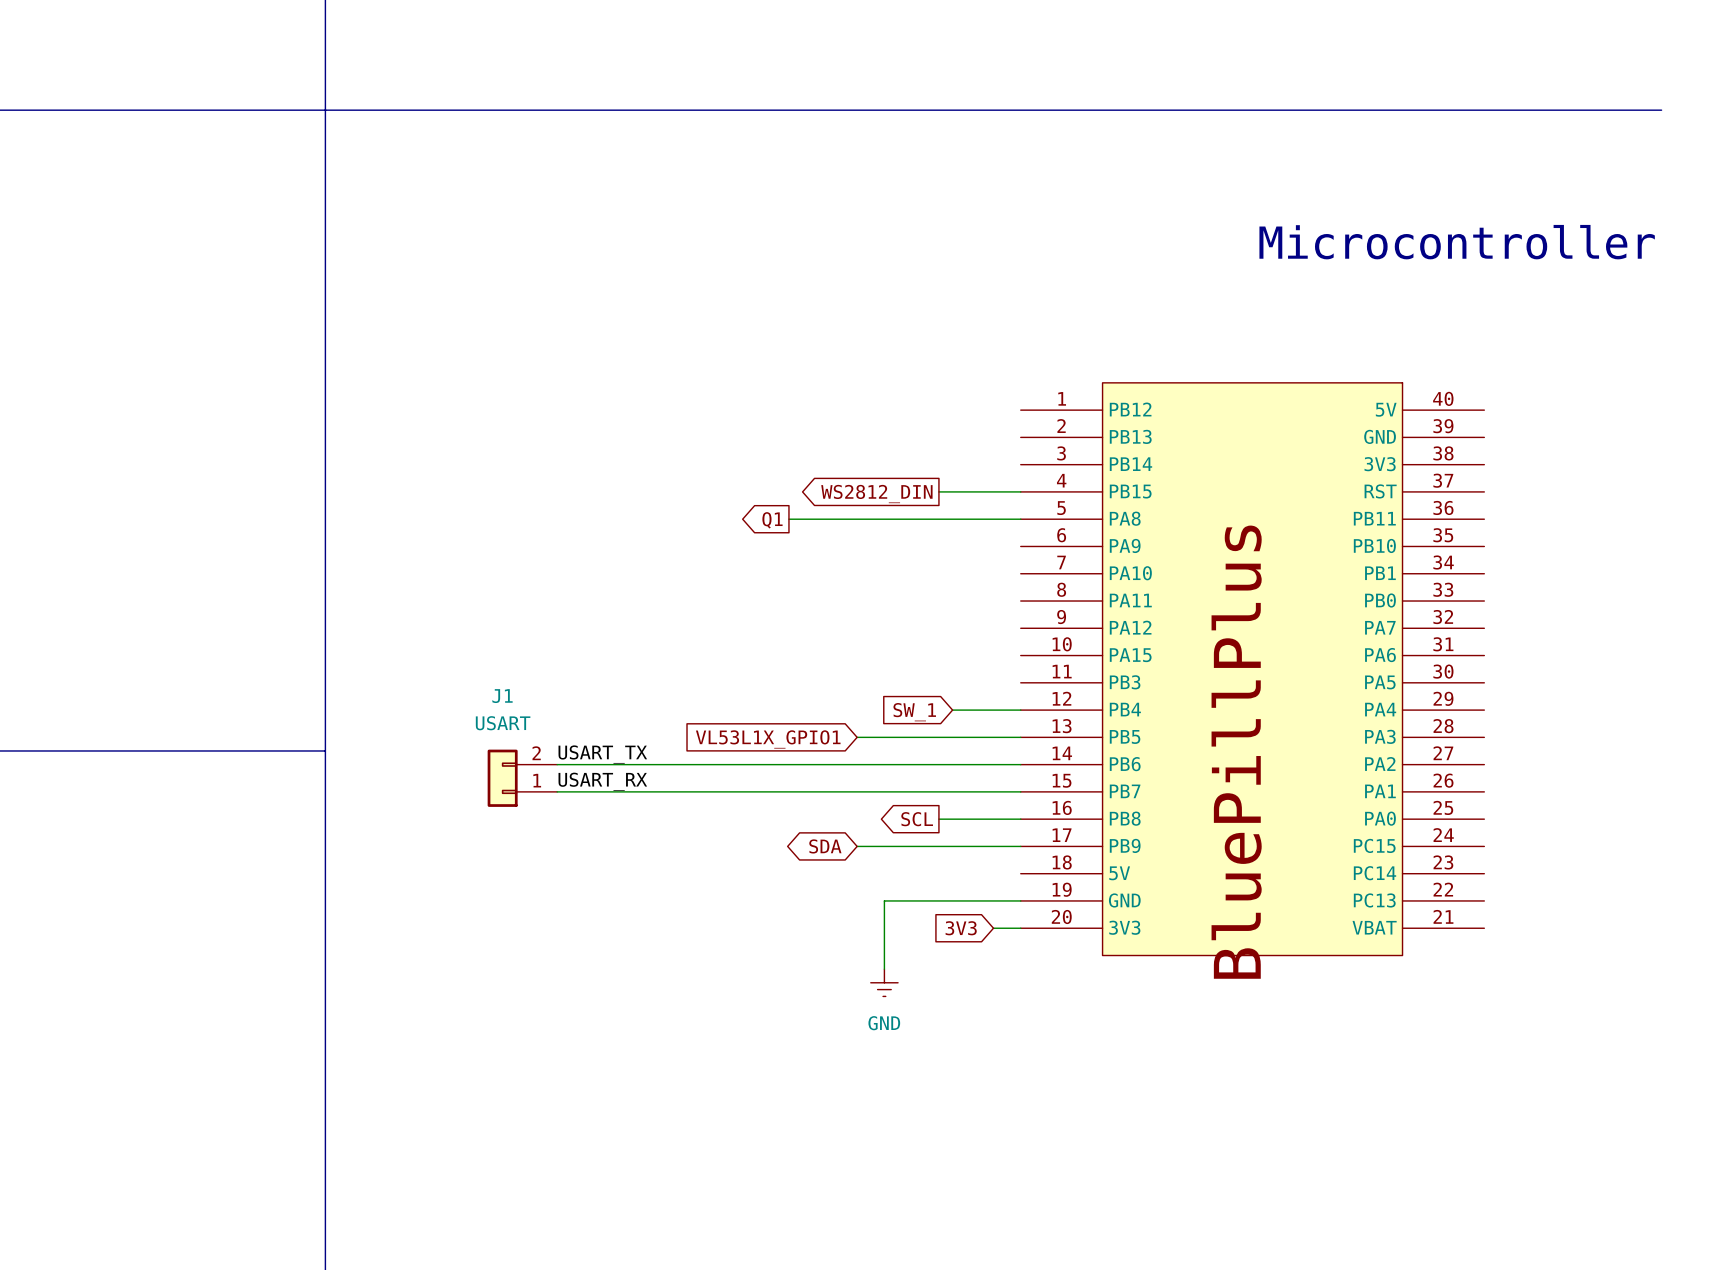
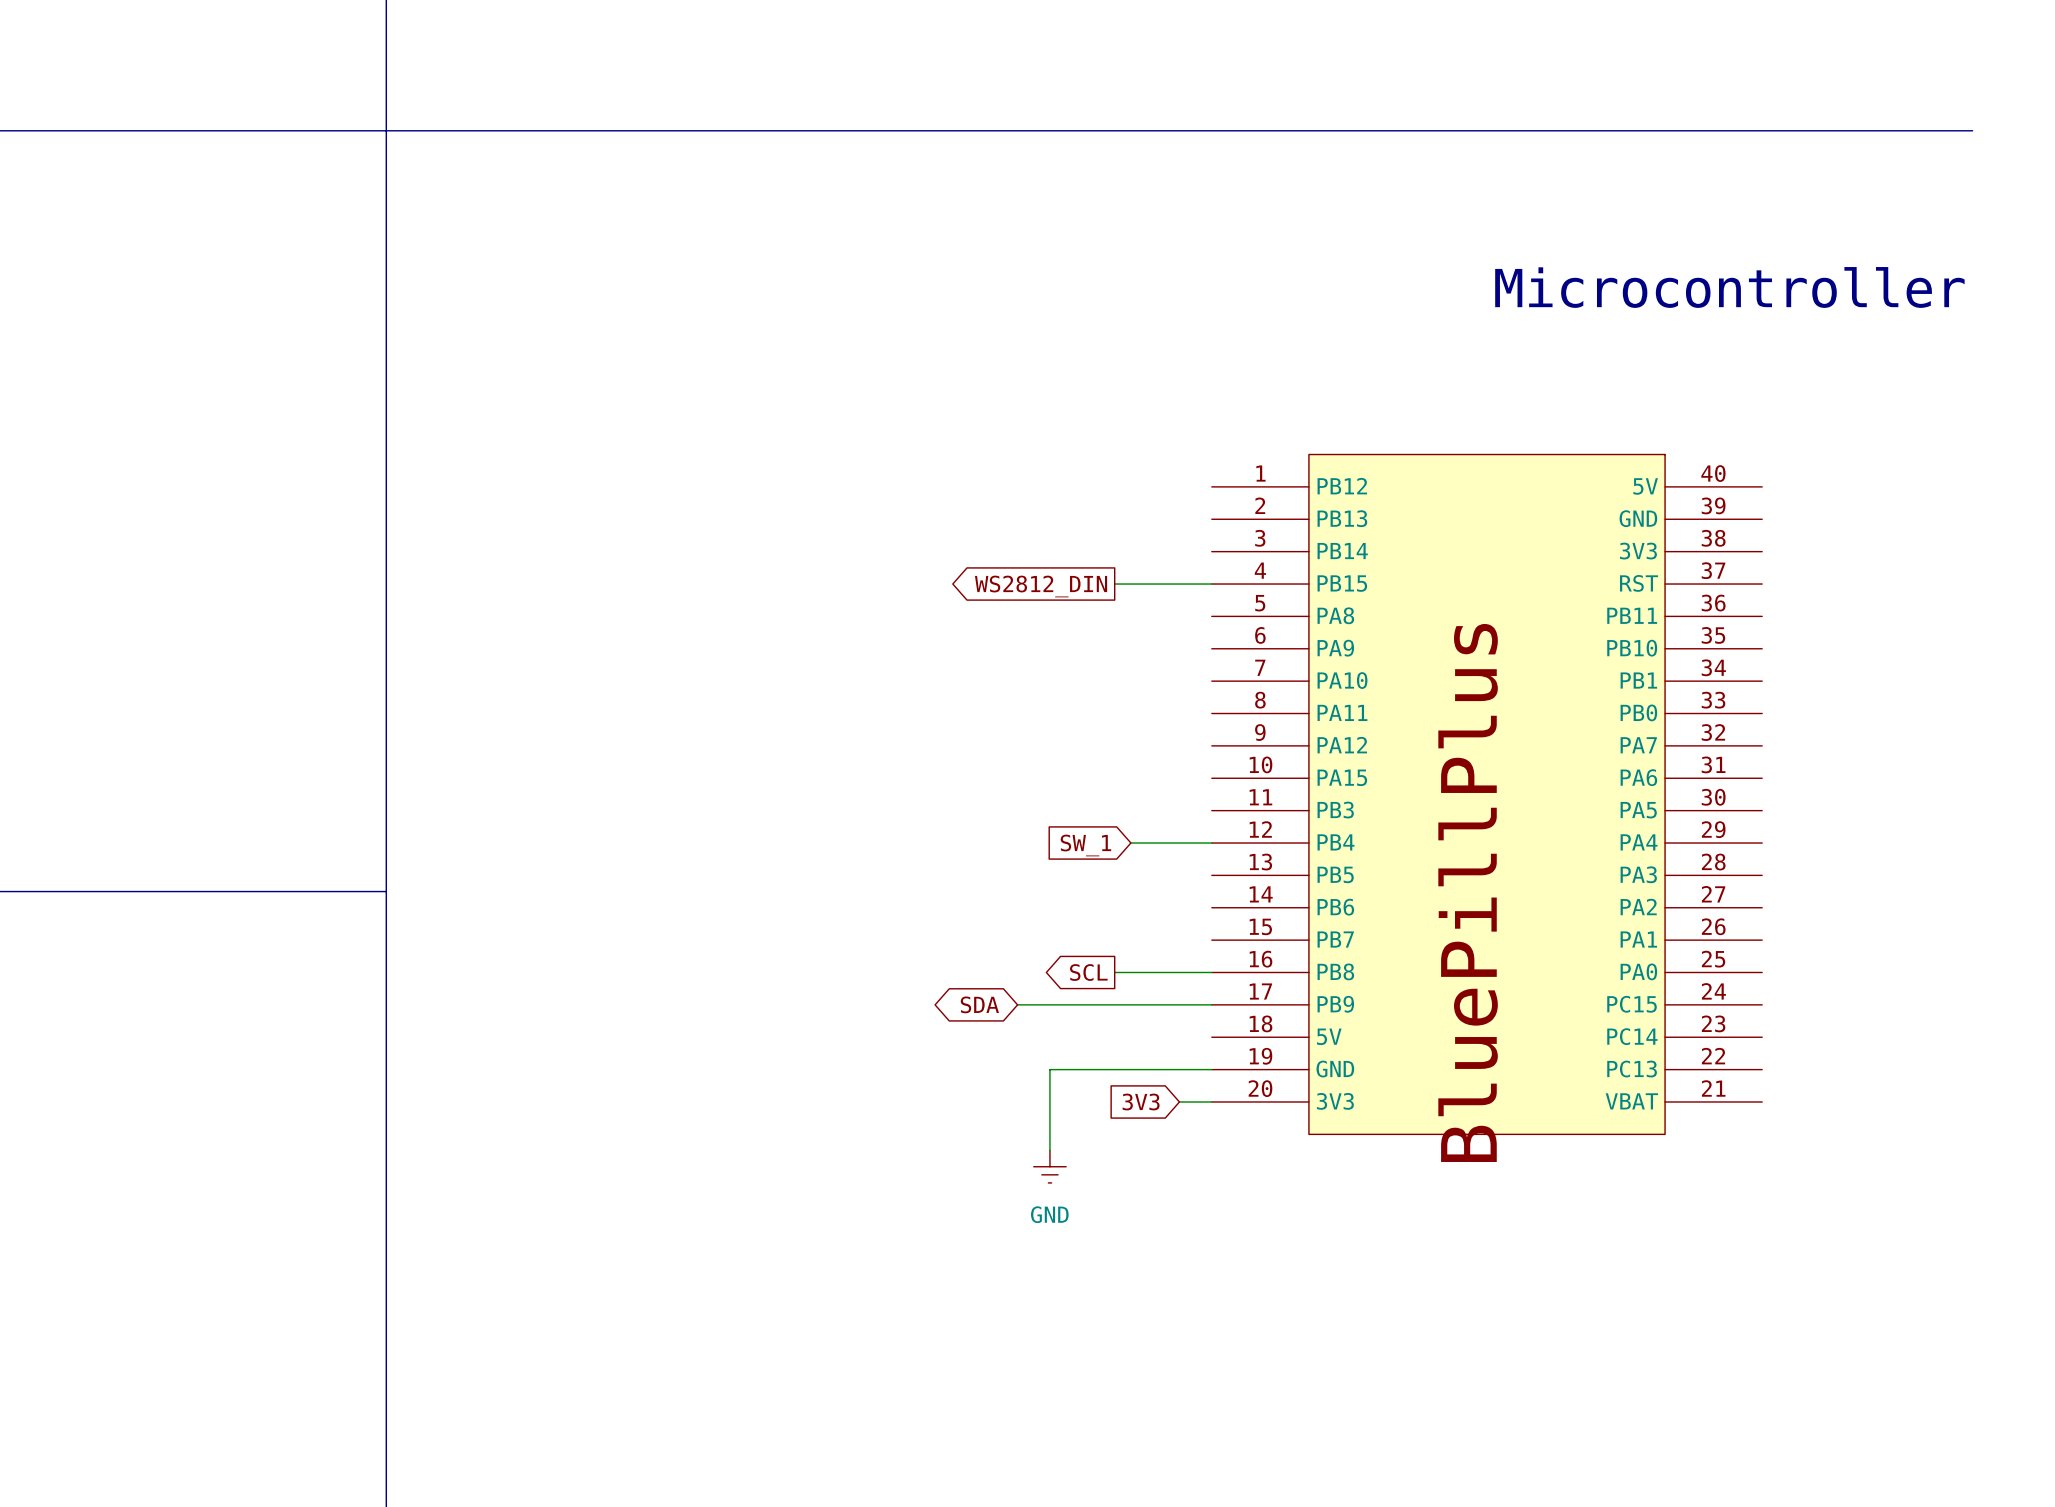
wire: (788, 519) (1020, 519) -> none
global label: Q1 (772, 520) -> none
wire: (857, 737) (1020, 737) -> none
global label: VL53L1X_GPIO1 (768, 739) -> none
label: USART_TX (602, 754) -> none
wire: (557, 764) (1020, 764) -> none
J1: USART (522, 778) -> none
label: USART_RX (602, 781) -> none
wire: (557, 791) (1020, 791) -> none

